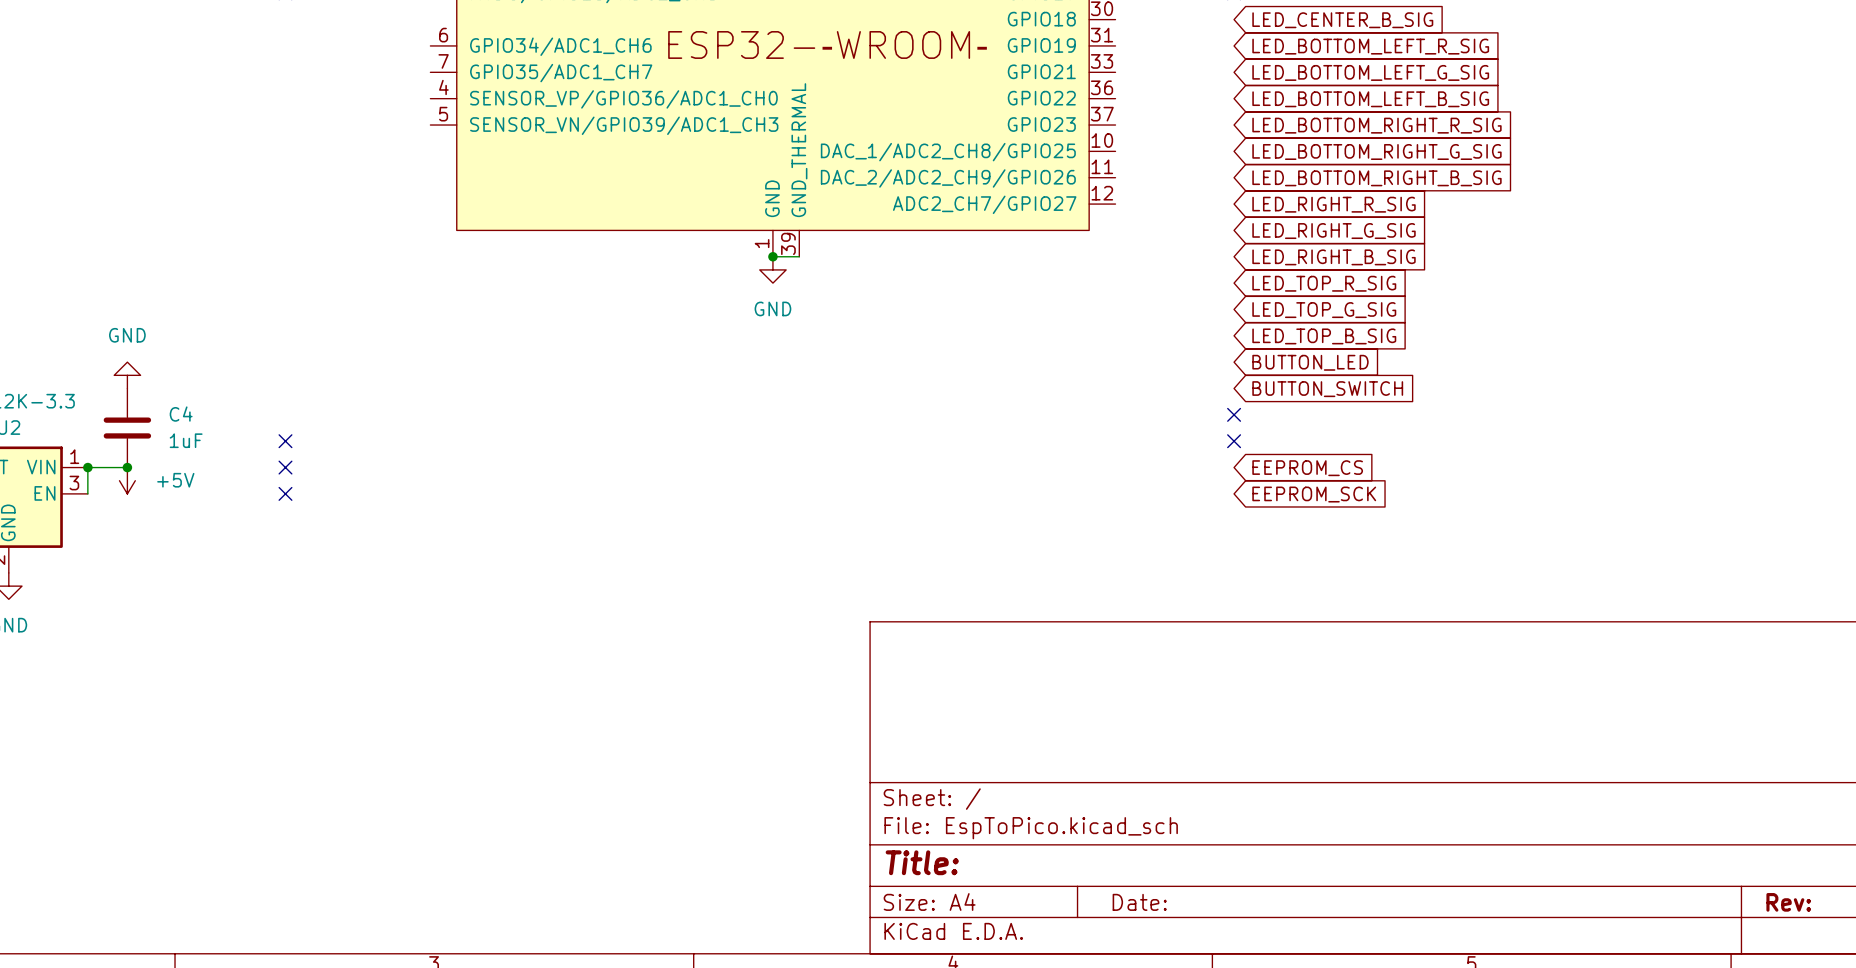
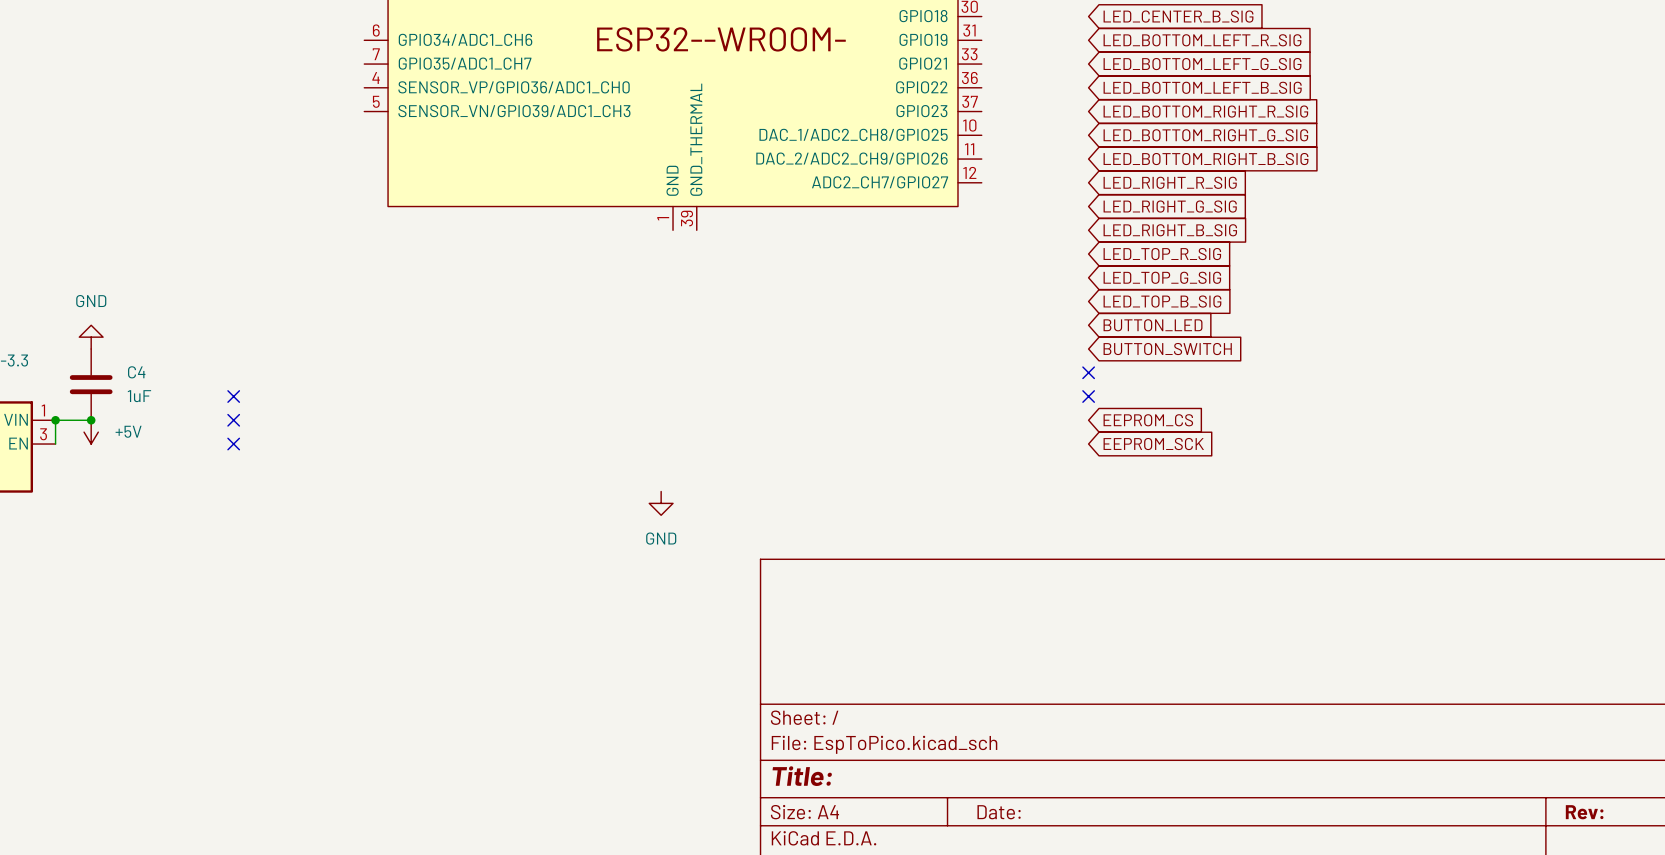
wire: (772, 256) (799, 256) -> none
junction: (772, 256) -> none
power symbol: GND (772, 269) -> none
power symbol: none -> GND (661, 503)

